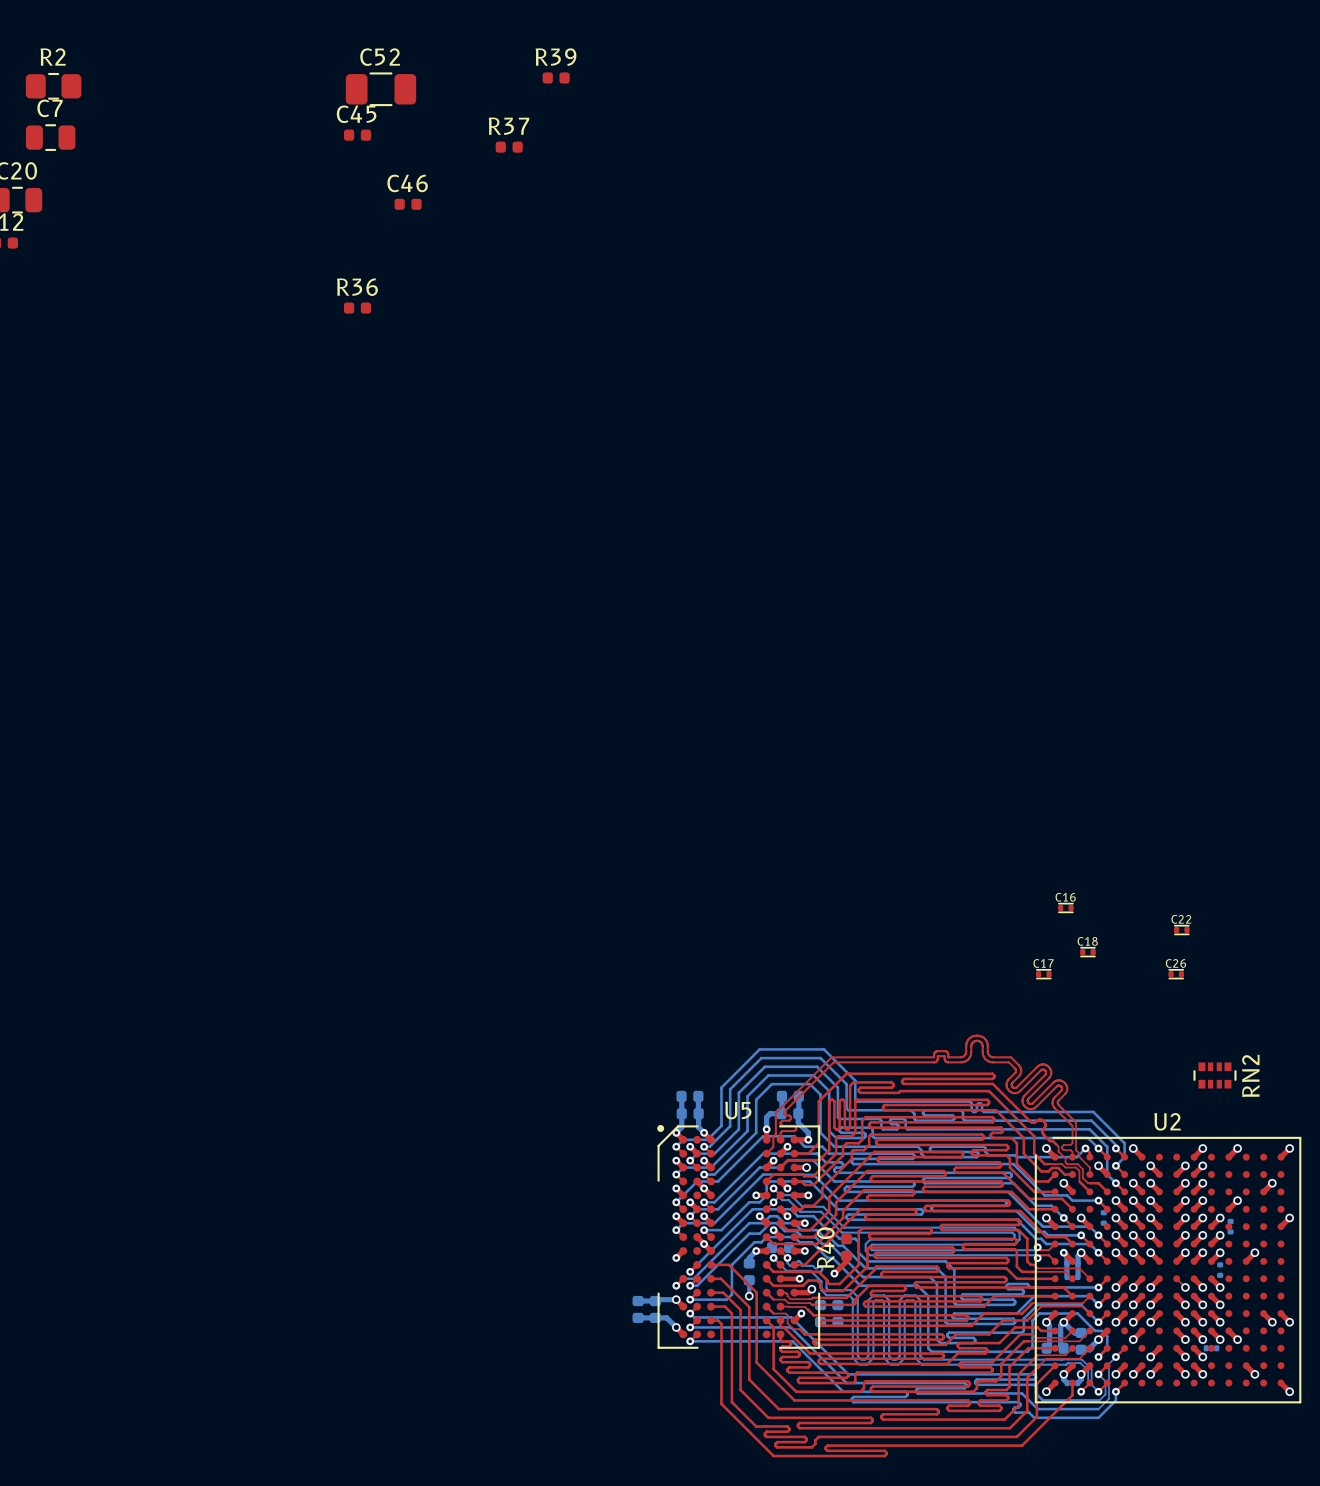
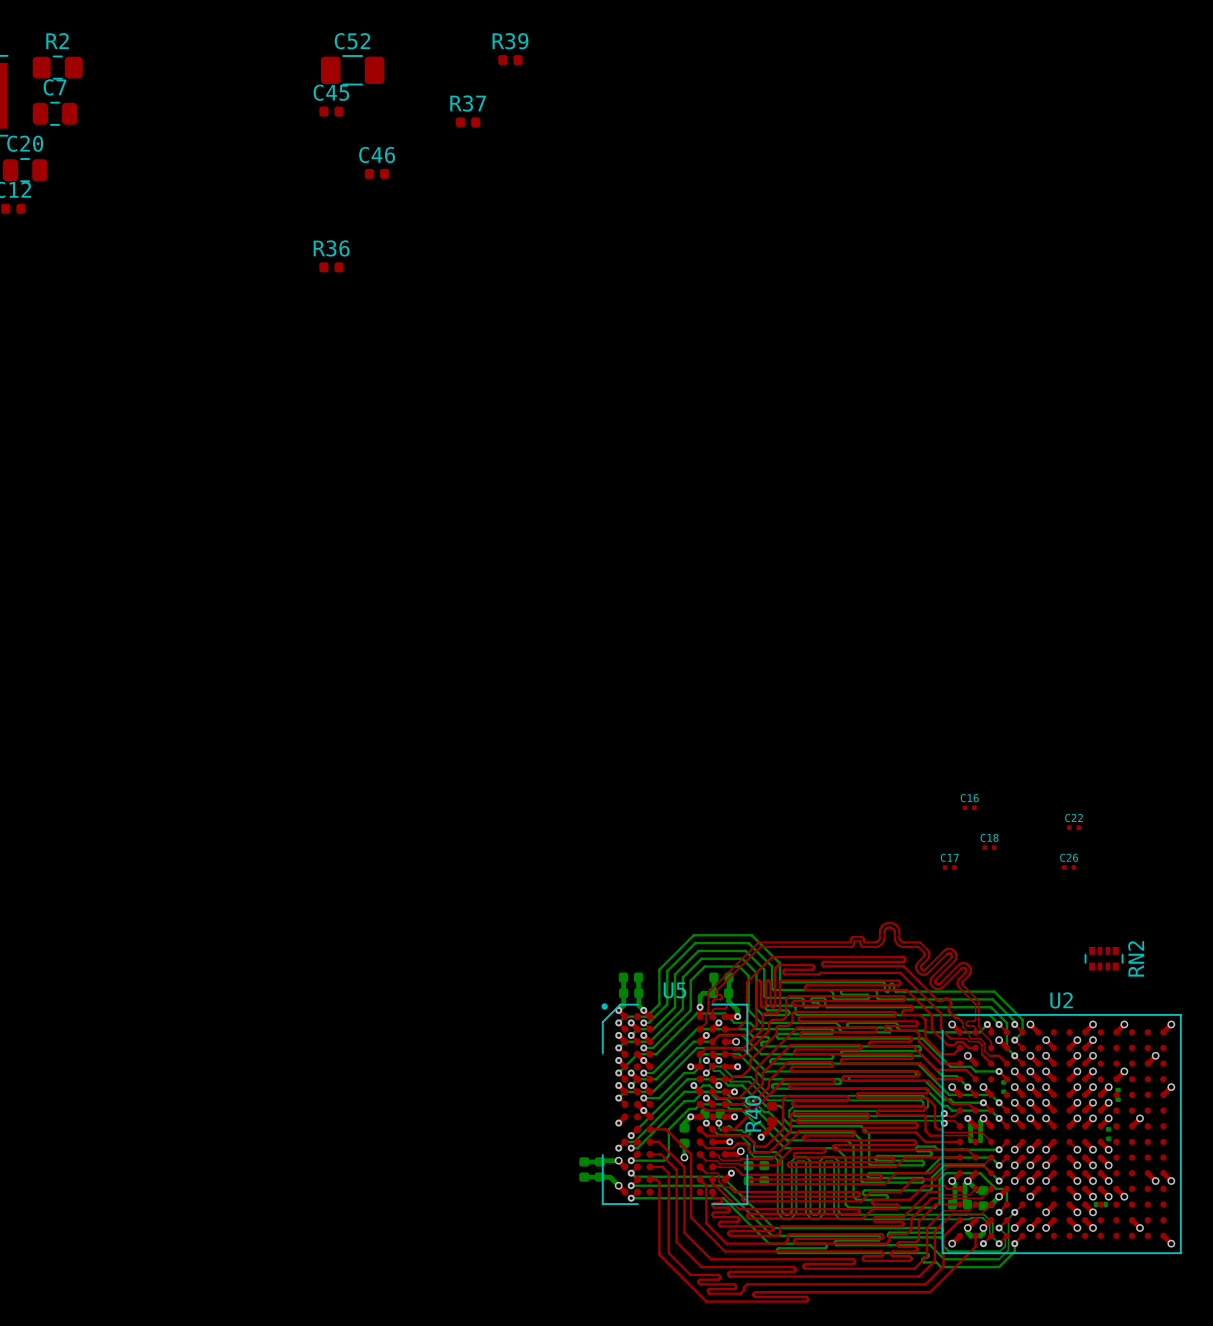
C16 footprint: [1058, 902, 1074, 914] -> [962, 805, 977, 811]
C22 footprint: [1173, 924, 1190, 936] -> [1067, 825, 1082, 831]
C18 footprint: [1080, 946, 1096, 958] -> [982, 845, 997, 850]
C17 footprint: [1036, 968, 1052, 980] -> [942, 865, 957, 870]
C26 footprint: [1168, 968, 1185, 980] -> [1062, 865, 1077, 870]

